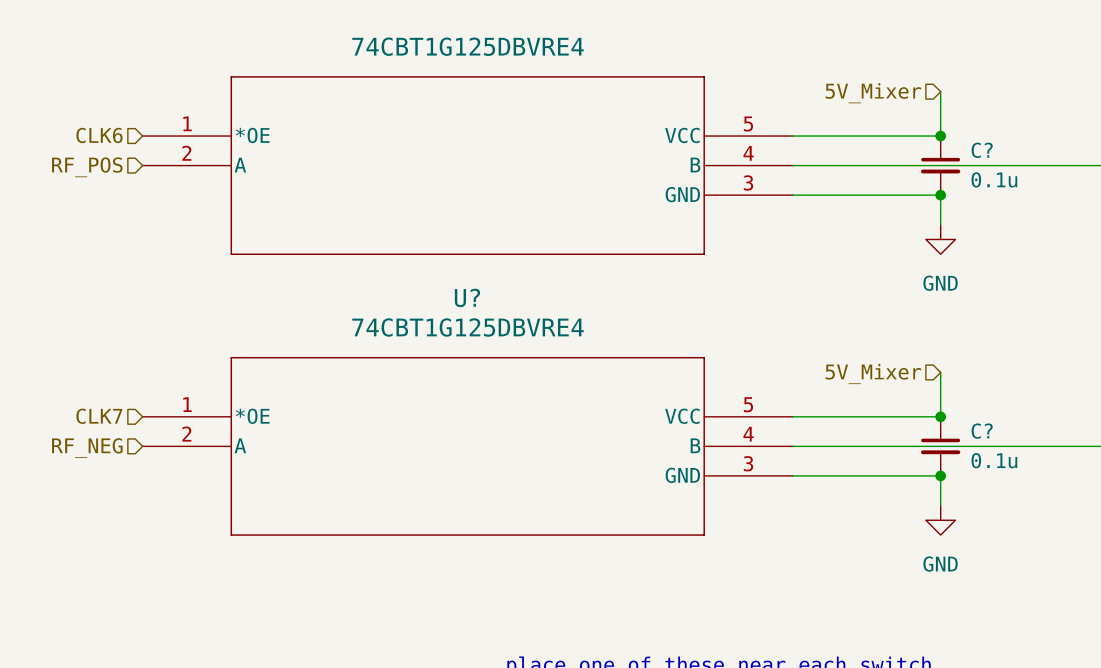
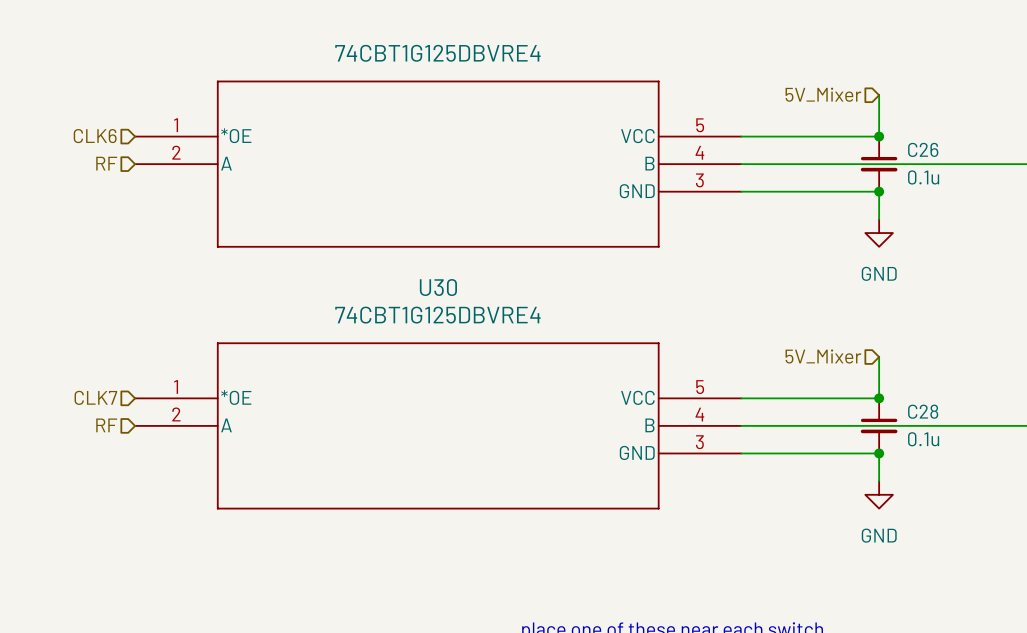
C? name: C? (982, 150) -> C26 (923, 149)
hierarchical label: RF_POS (87, 167) -> RF (106, 163)
U? name: U? (467, 297) -> U30 (438, 287)
C? name: C? (982, 431) -> C28 (923, 411)
hierarchical label: RF_NEG (87, 448) -> RF (106, 425)

